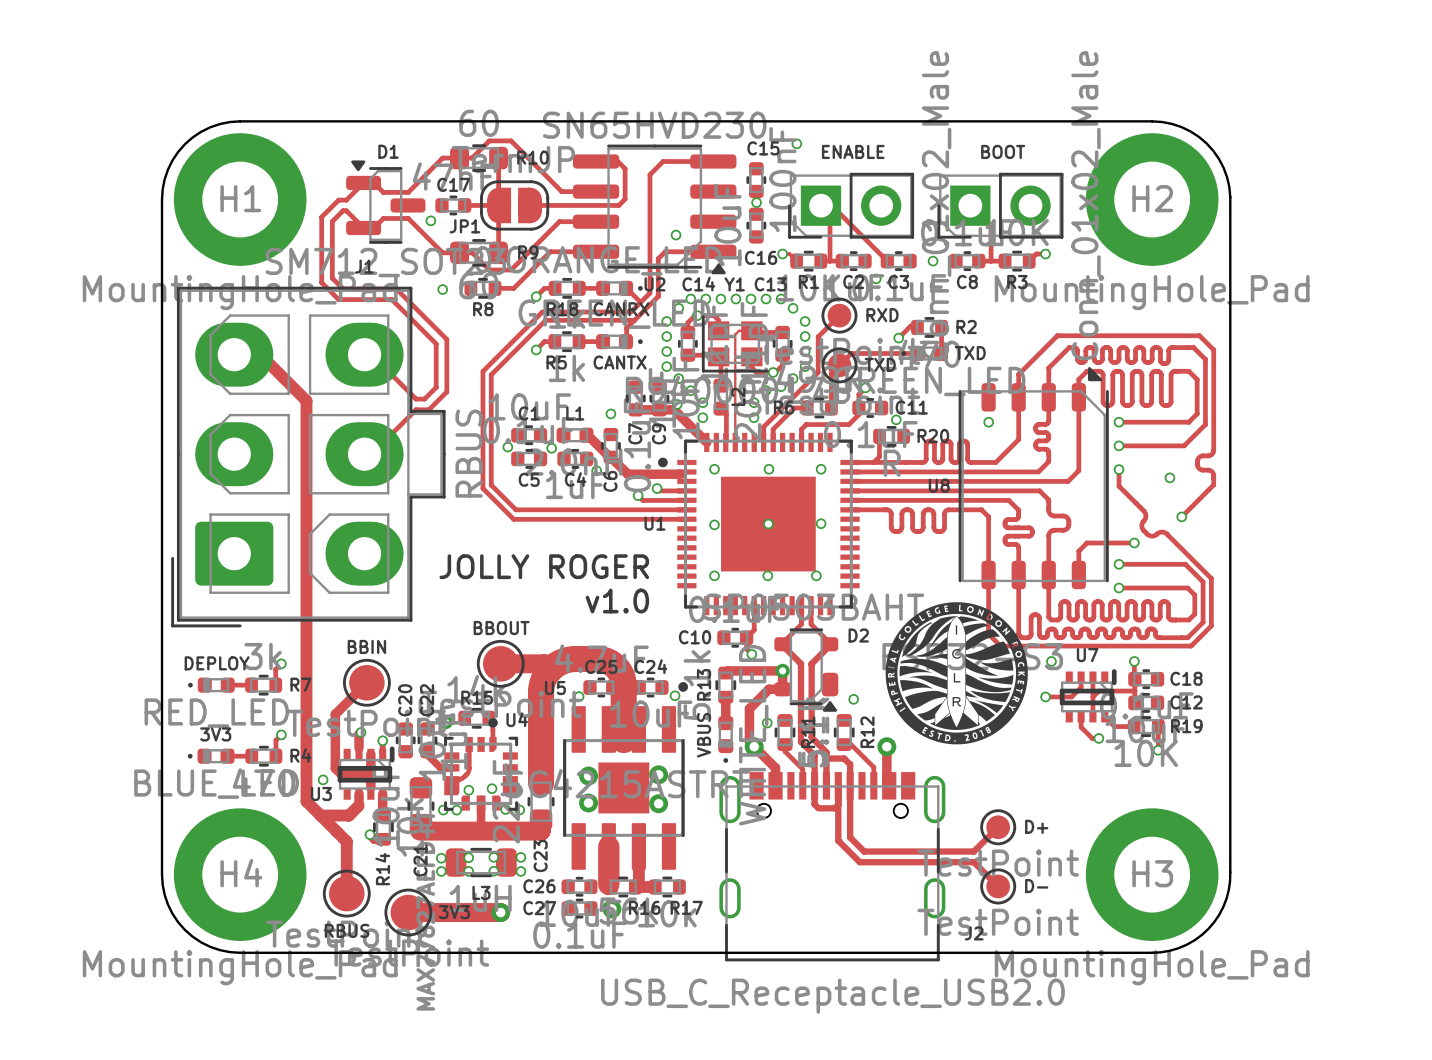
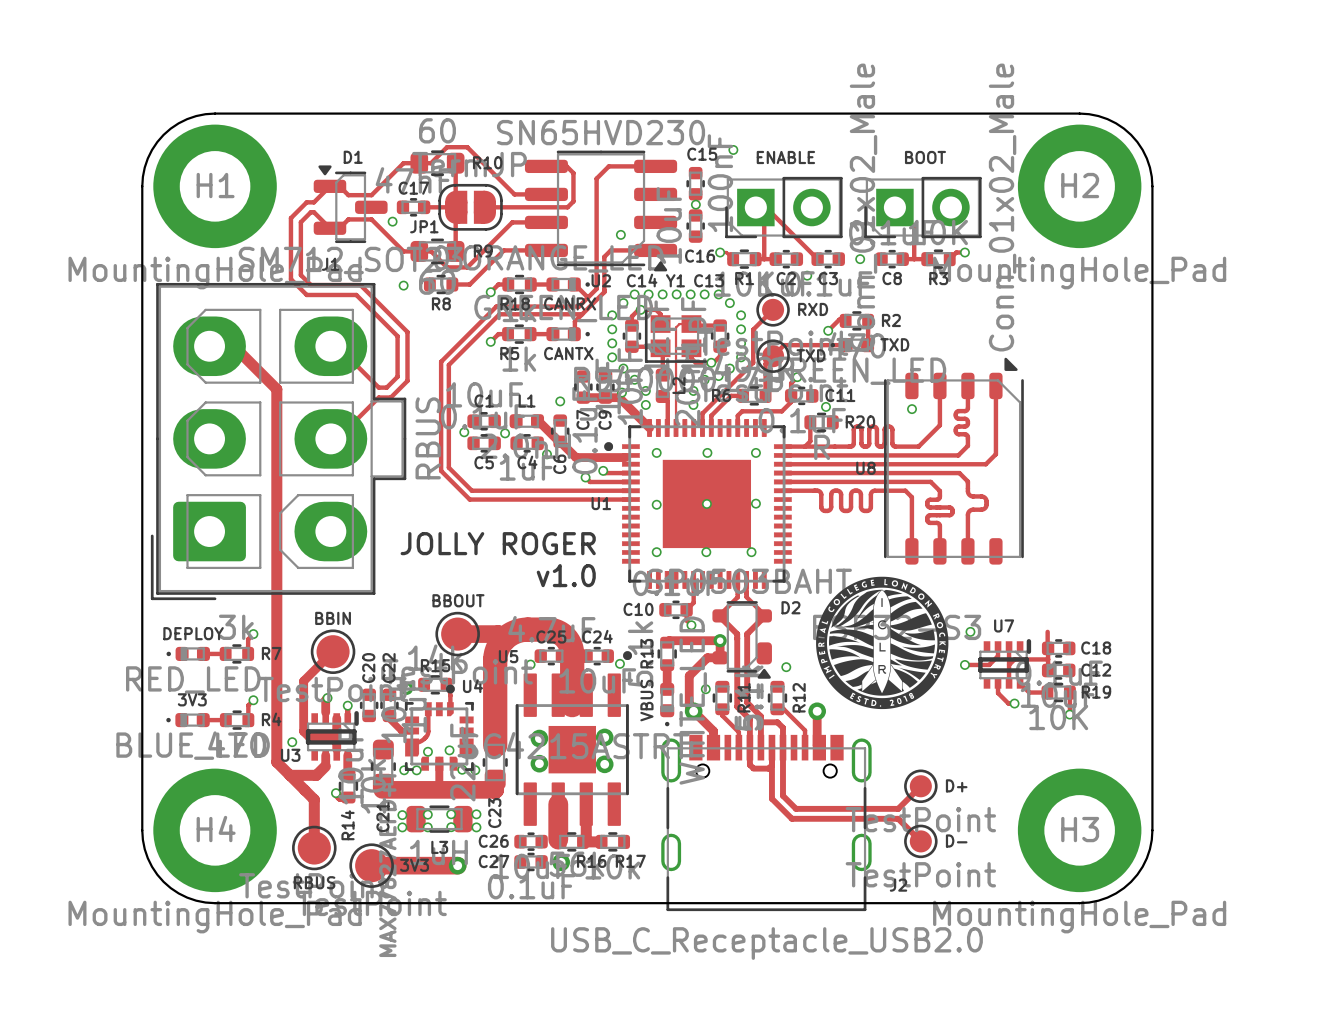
board edge: (162, 199) (167, 169) (184, 144) (210, 127) (240, 121) (1152, 121) (1172, 123) (1198, 136) (1213, 150) (1223, 167) (1230, 197) (1230, 881) (1223, 907) (1214, 922) (1201, 935) (1178, 948) (1152, 952) -> (142, 201) (144, 167) (157, 142) (178, 123) (205, 114) (1079, 113) (1107, 119) (1123, 128) (1137, 142) (1146, 158) (1152, 186) (1151, 839) (1142, 866) (1123, 888) (1098, 900) (1064, 903)
H1 position: (240, 199) -> (215, 186)
H2 position: (1152, 199) -> (1079, 186)
track: (1018, 397) (1018, 374) (1057, 335) (1199, 335) (1213, 349) (1213, 450) (1210, 455) (1199, 457) (1197, 465) (1200, 469) (1212, 472) (1213, 484) (1181, 516) -> none
track: (1048, 397) (1048, 368) (1069, 347) (1076, 348) (1077, 360) (1080, 362) (1085, 360) (1085, 350) (1088, 347) (1093, 349) (1094, 360) (1097, 362) (1102, 360) (1104, 347) (1109, 348) (1111, 360) (1115, 362) (1118, 360) (1119, 349) (1125, 347) (1127, 350) (1127, 360) (1132, 362) (1135, 360) (1136, 349) (1141, 347) (1143, 350) (1144, 360) (1148, 362) (1151, 360) (1152, 349) (1157, 347) (1160, 350) (1160, 361) (1163, 363) (1168, 361) (1170, 347) (1193, 347) (1205, 359) (1205, 424) (1184, 445) (1118, 445) -> none
track: (1078, 397) (1078, 379) (1087, 371) (1102, 373) (1103, 401) (1106, 405) (1112, 402) (1112, 374) (1115, 371) (1122, 373) (1122, 401) (1125, 405) (1132, 402) (1132, 374) (1134, 371) (1141, 373) (1141, 401) (1145, 405) (1151, 402) (1151, 374) (1153, 371) (1158, 371) (1161, 373) (1161, 401) (1164, 405) (1168, 405) (1170, 402) (1172, 372) (1188, 371) (1197, 379) (1197, 413) (1188, 422) (1118, 422) -> none
via: (1118, 422) -> none
via: (1118, 445) -> none
track: (1118, 469) (1118, 486) (1145, 513) (1145, 517) (1141, 525) (1143, 530) (1151, 536) (1161, 532) (1166, 533) (1211, 578) (1211, 625) (1191, 646) (1000, 646) (988, 634) (988, 574) -> none
via: (1118, 469) -> none
via: (1169, 477) -> none
via: (1181, 516) -> none
track: (1134, 543) (1087, 543) (1078, 551) (1078, 574) -> none
via: (1134, 543) -> none
track: (1118, 564) (1185, 564) (1203, 581) (1203, 622) (1187, 637) (1158, 637) (1152, 629) (1147, 630) (1144, 637) (1140, 637) (1138, 630) (1133, 629) (1131, 630) (1129, 636) (1125, 637) (1118, 629) (1114, 630) (1113, 636) (1110, 637) (1106, 636) (1102, 629) (1098, 630) (1096, 636) (1094, 637) (1089, 636) (1086, 629) (1082, 629) (1080, 636) (1075, 637) (1073, 636) (1071, 630) (1066, 629) (1063, 636) (1059, 637) (1056, 636) (1055, 630) (1050, 629) (1046, 636) (1042, 637) (1039, 634) (1039, 617) (1034, 614) (1031, 617) (1030, 635) (1021, 637) (1018, 634) (1018, 574) -> none
via: (1118, 564) -> none
track: (1048, 574) (1048, 617) (1051, 619) (1060, 618) (1060, 604) (1064, 601) (1068, 603) (1069, 617) (1071, 619) (1076, 618) (1077, 604) (1080, 601) (1085, 603) (1085, 617) (1088, 619) (1093, 618) (1093, 604) (1097, 601) (1101, 603) (1102, 617) (1105, 619) (1110, 618) (1110, 604) (1113, 601) (1118, 603) (1118, 617) (1121, 619) (1126, 618) (1127, 604) (1129, 601) (1135, 603) (1135, 617) (1137, 619) (1143, 618) (1143, 604) (1146, 601) (1151, 603) (1152, 617) (1154, 619) (1159, 618) (1160, 604) (1163, 601) (1168, 603) (1168, 617) (1170, 619) (1188, 619) (1194, 614) (1194, 595) (1187, 588) (1118, 588) -> none
via: (1118, 588) -> none
via: (1134, 661) -> none
H3 position: (1152, 874) -> (1079, 830)

